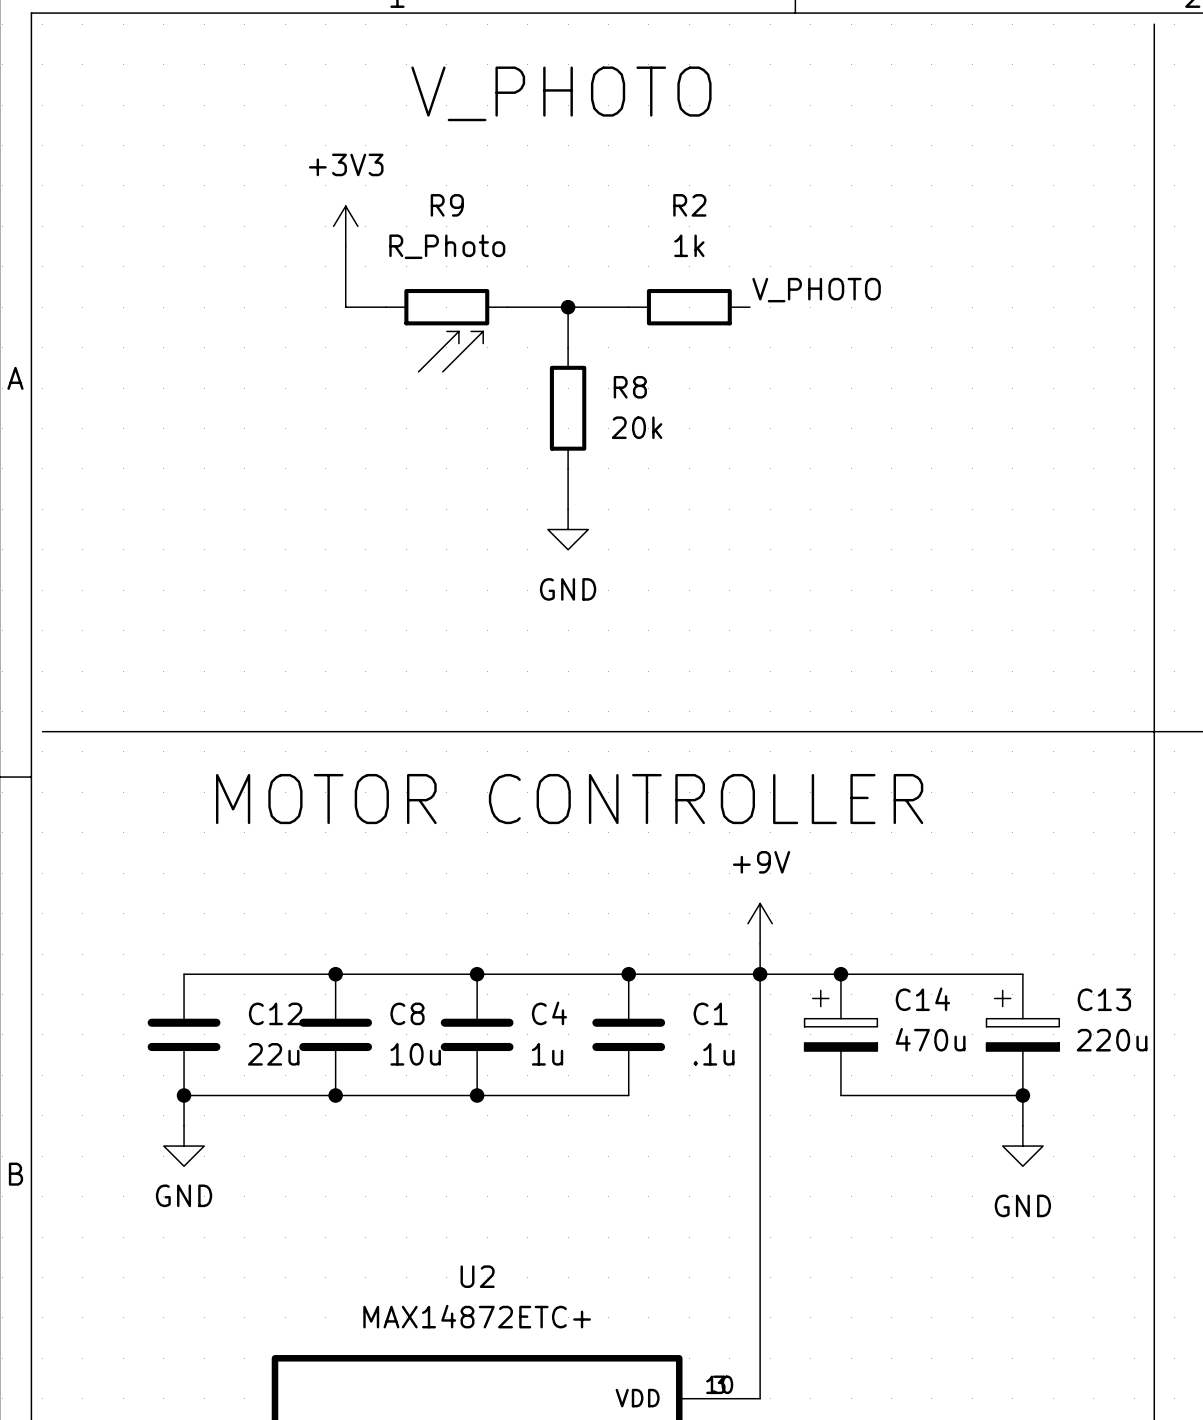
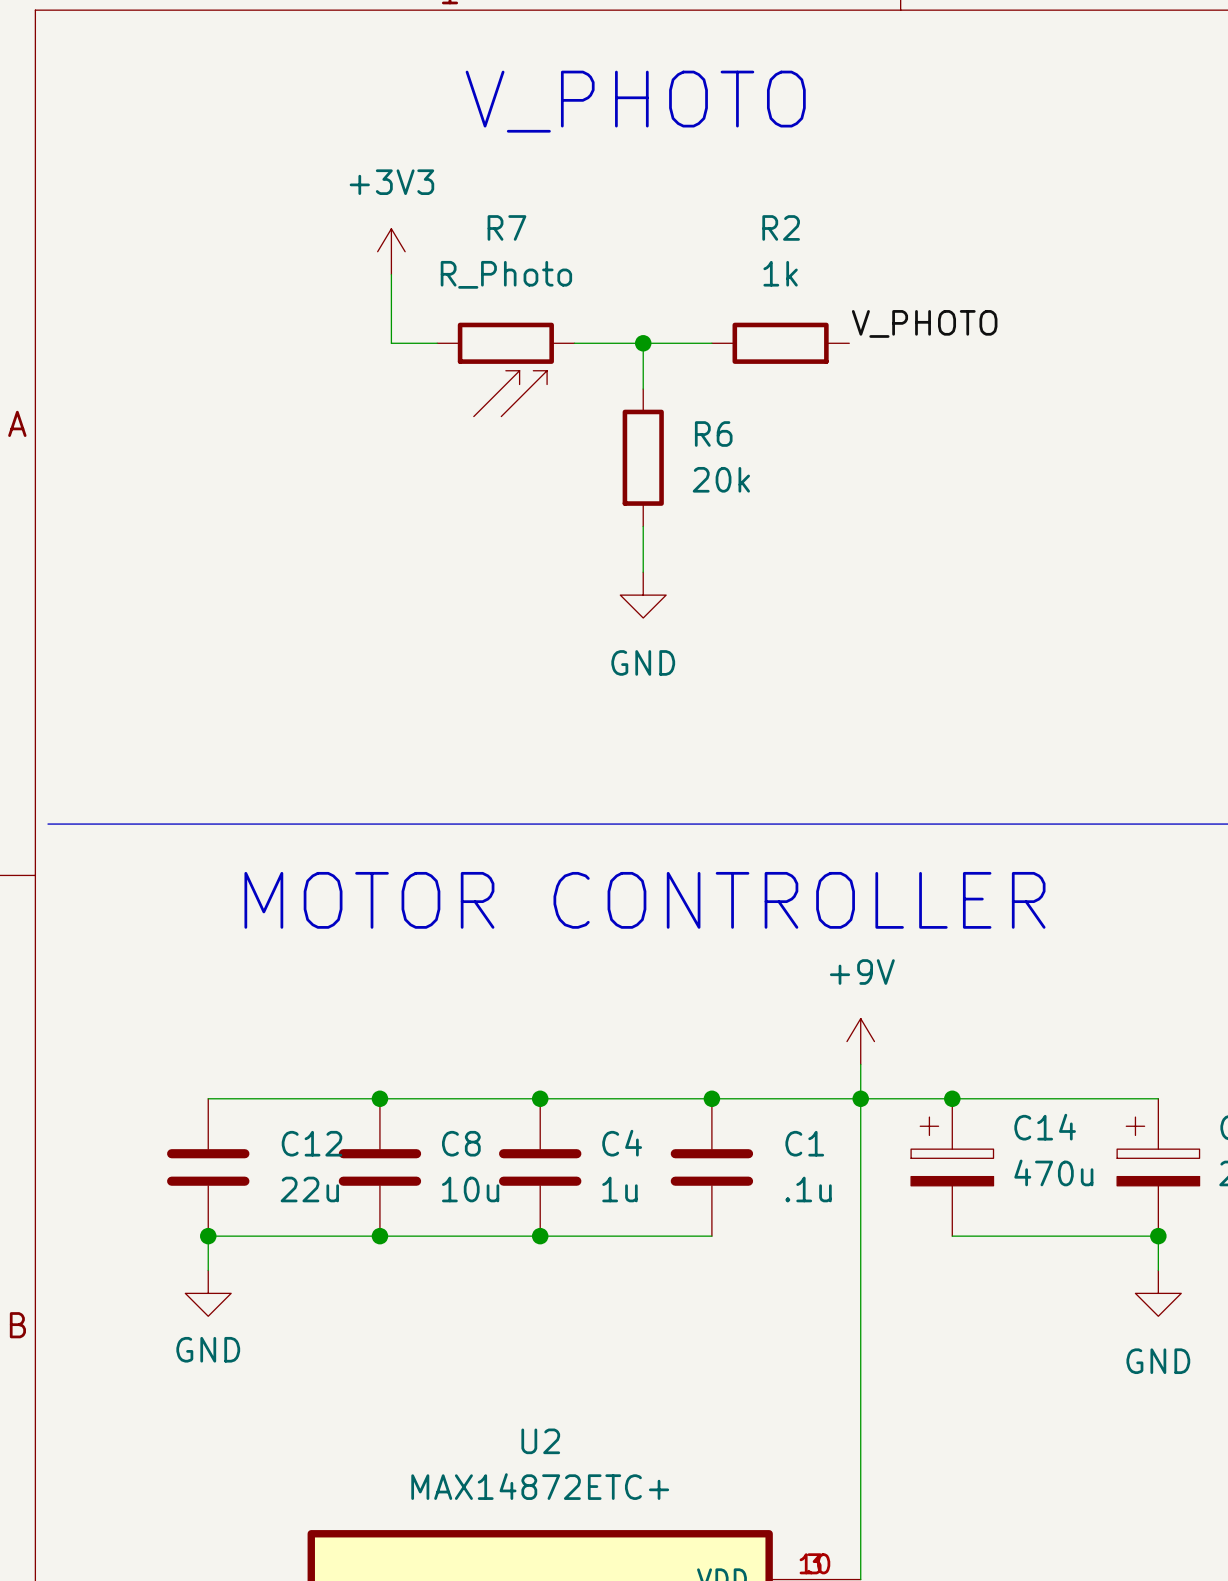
R9 name: R9 (447, 205) -> R7 (506, 227)
R8 name: R8 (630, 387) -> R6 (713, 434)

